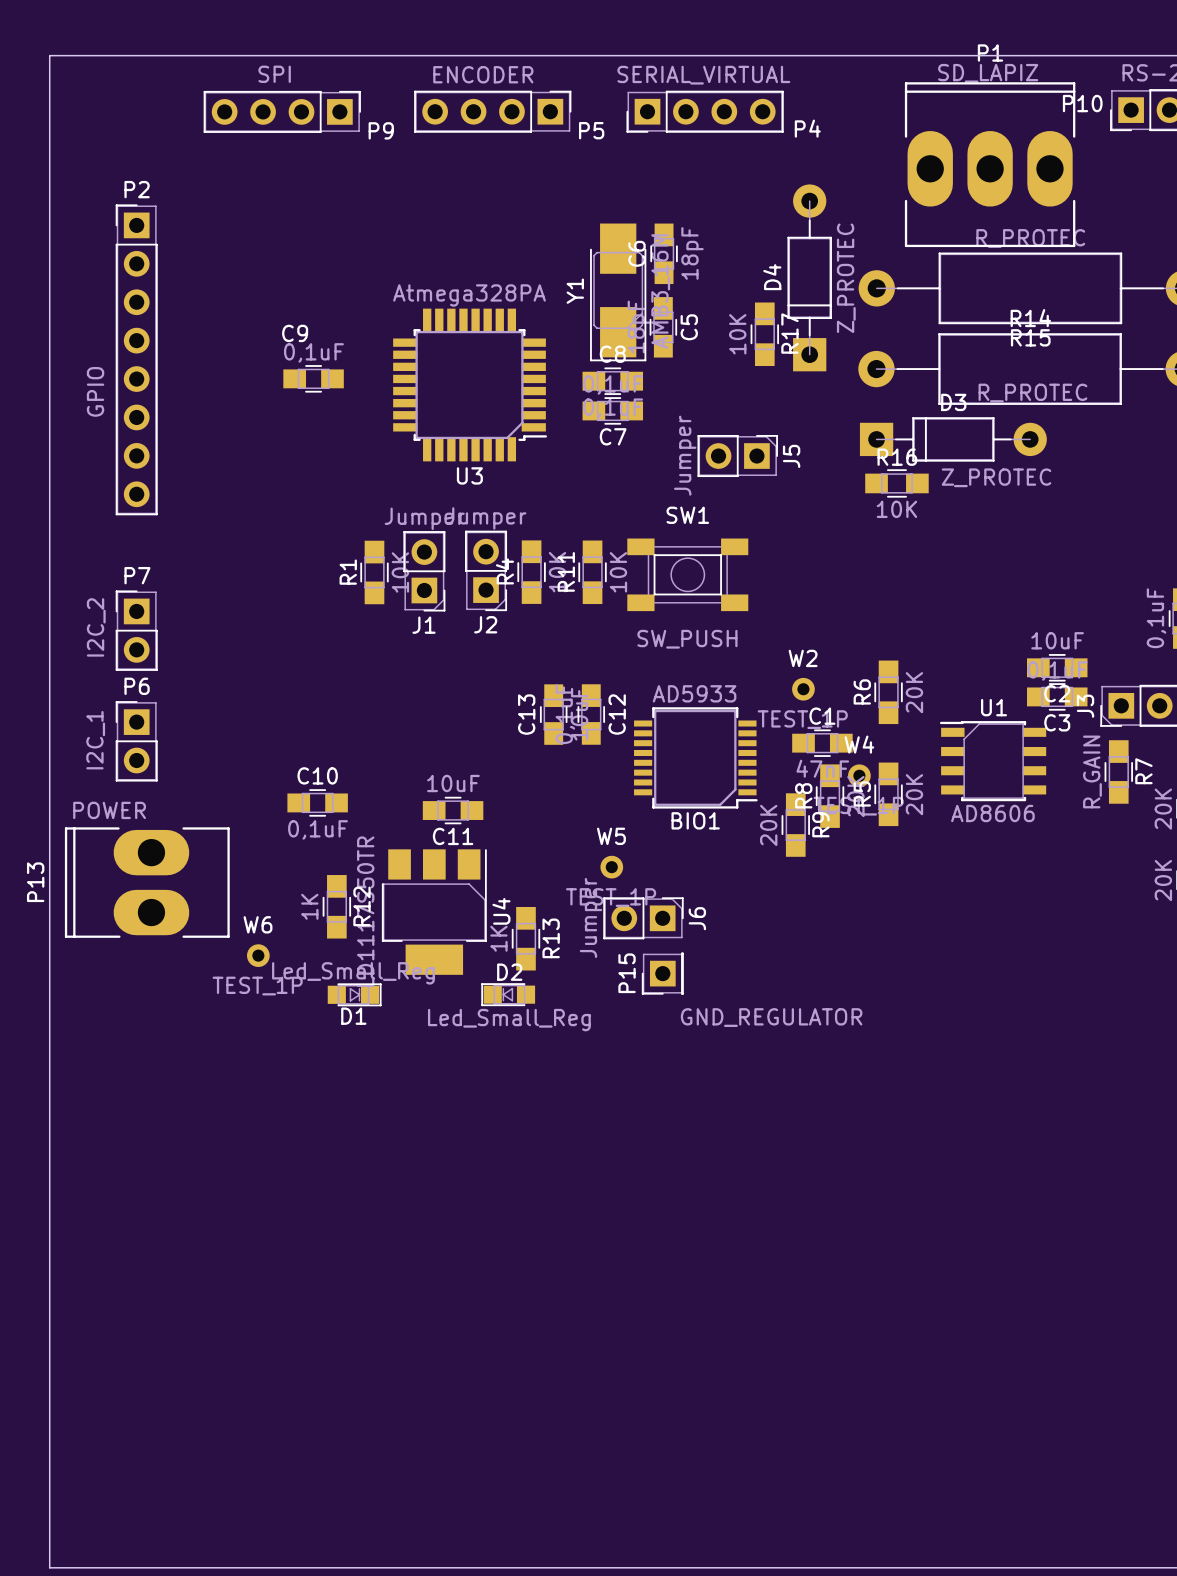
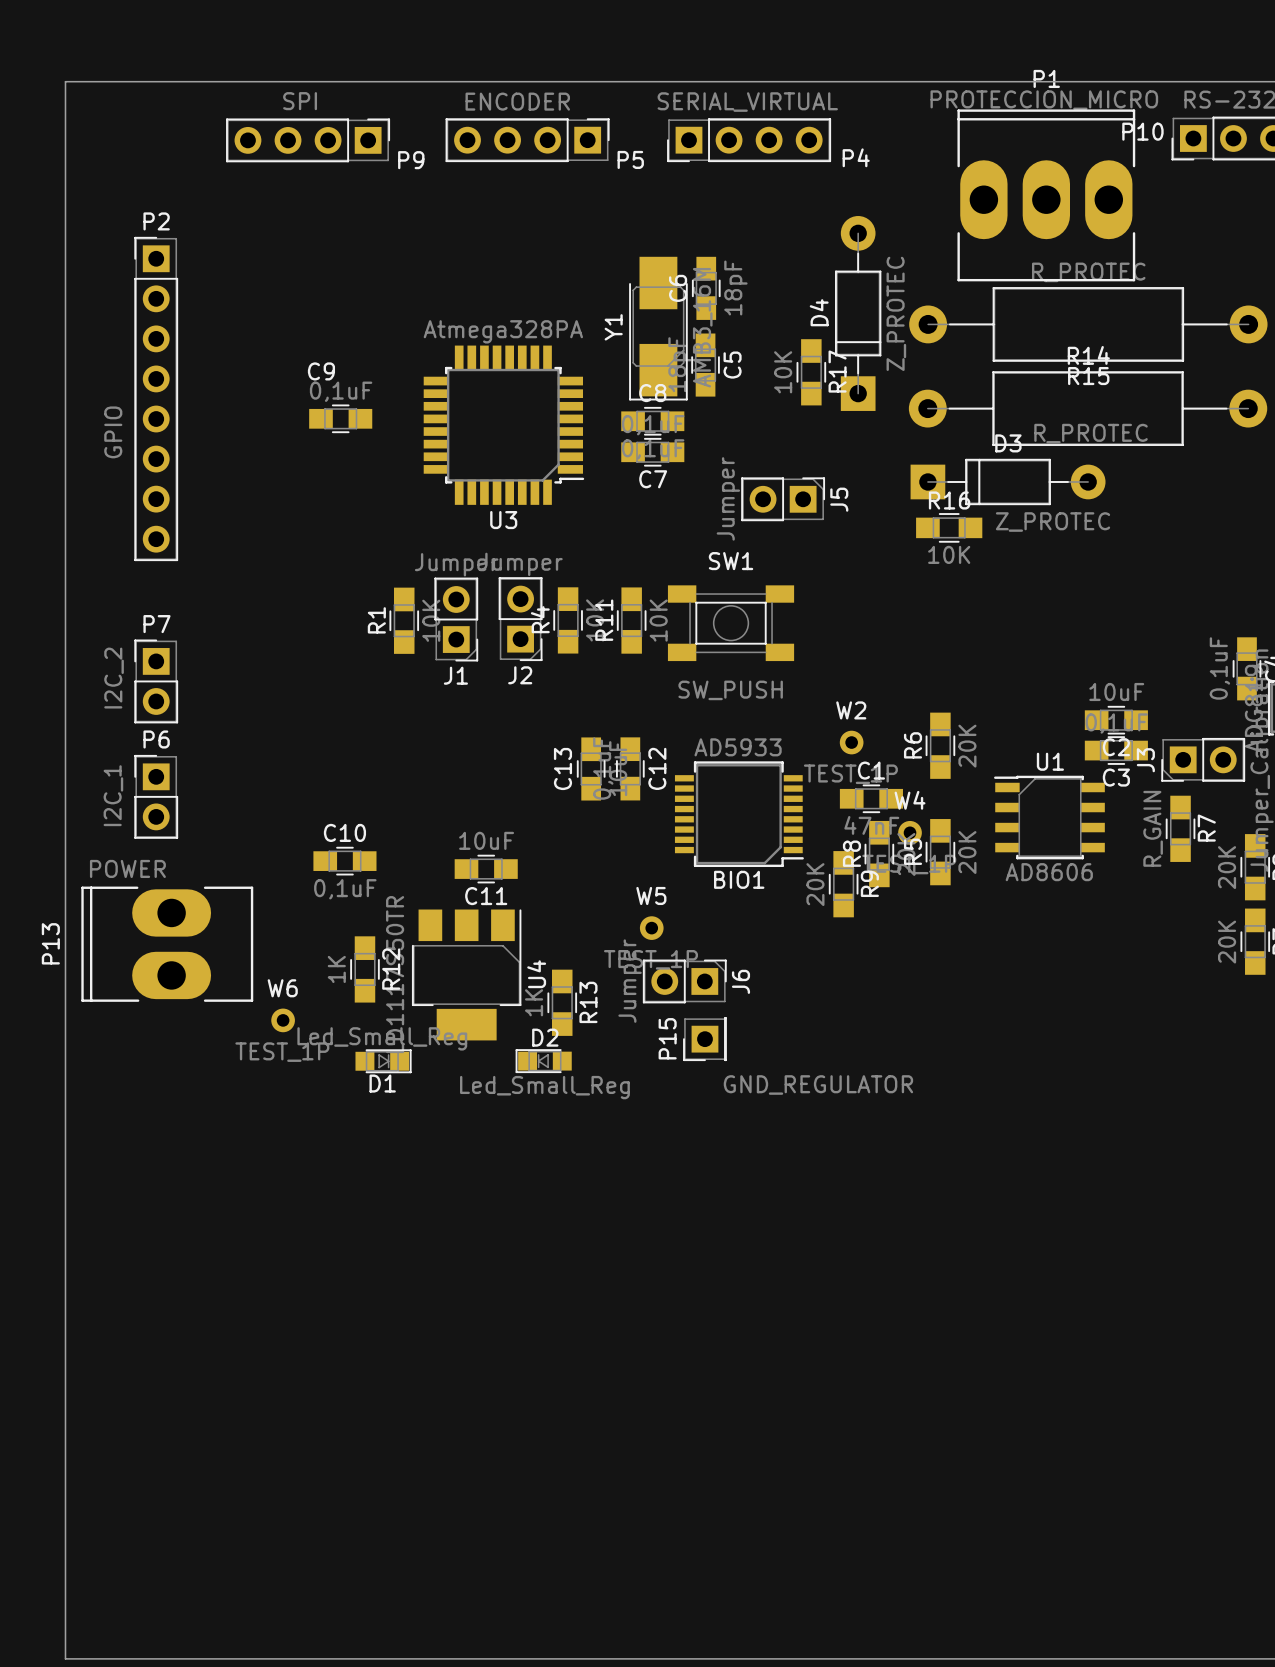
P1 value: SD_LAPIZ (988, 73) -> PROTECCION_MICRO (1044, 100)

